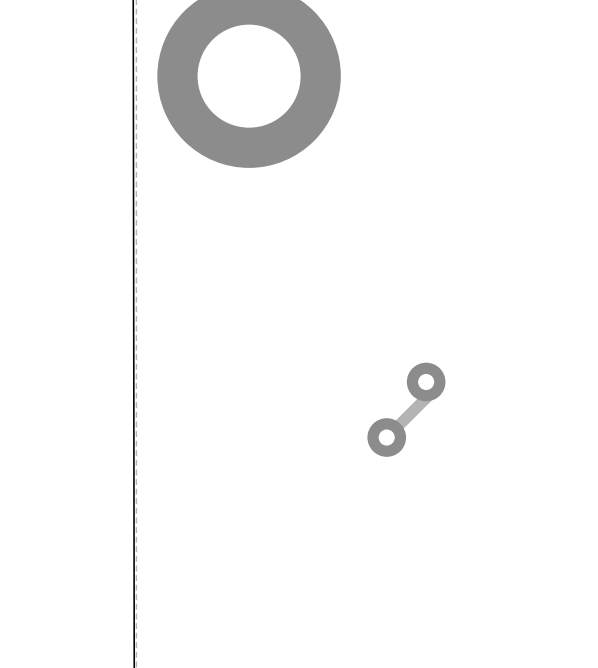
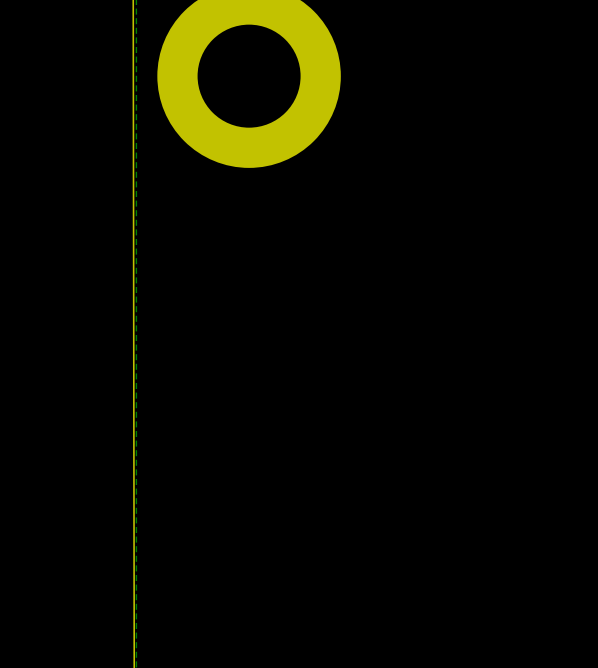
track: (426, 382) (426, 398) (386, 437) -> none
via: (426, 382) -> none
via: (386, 437) -> none

